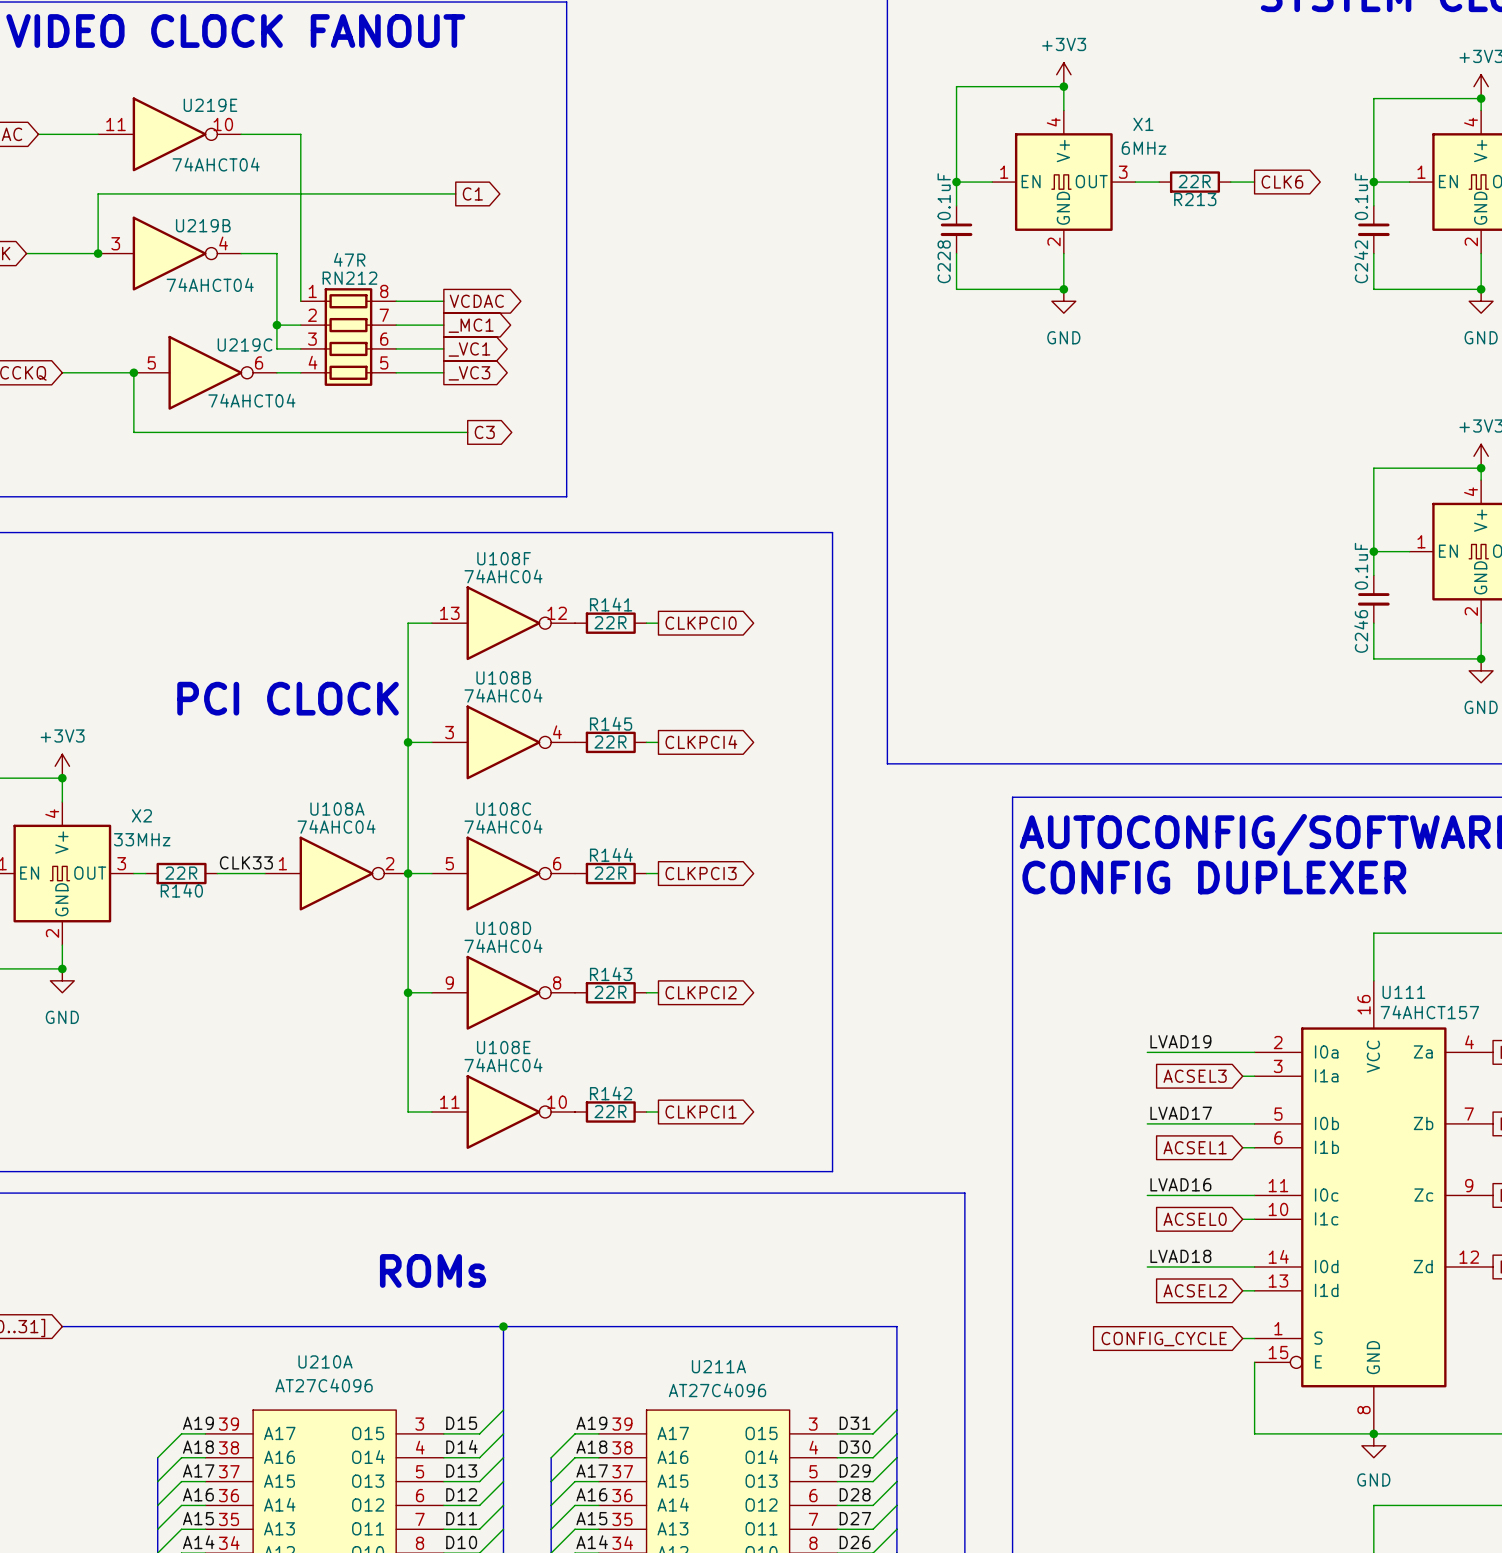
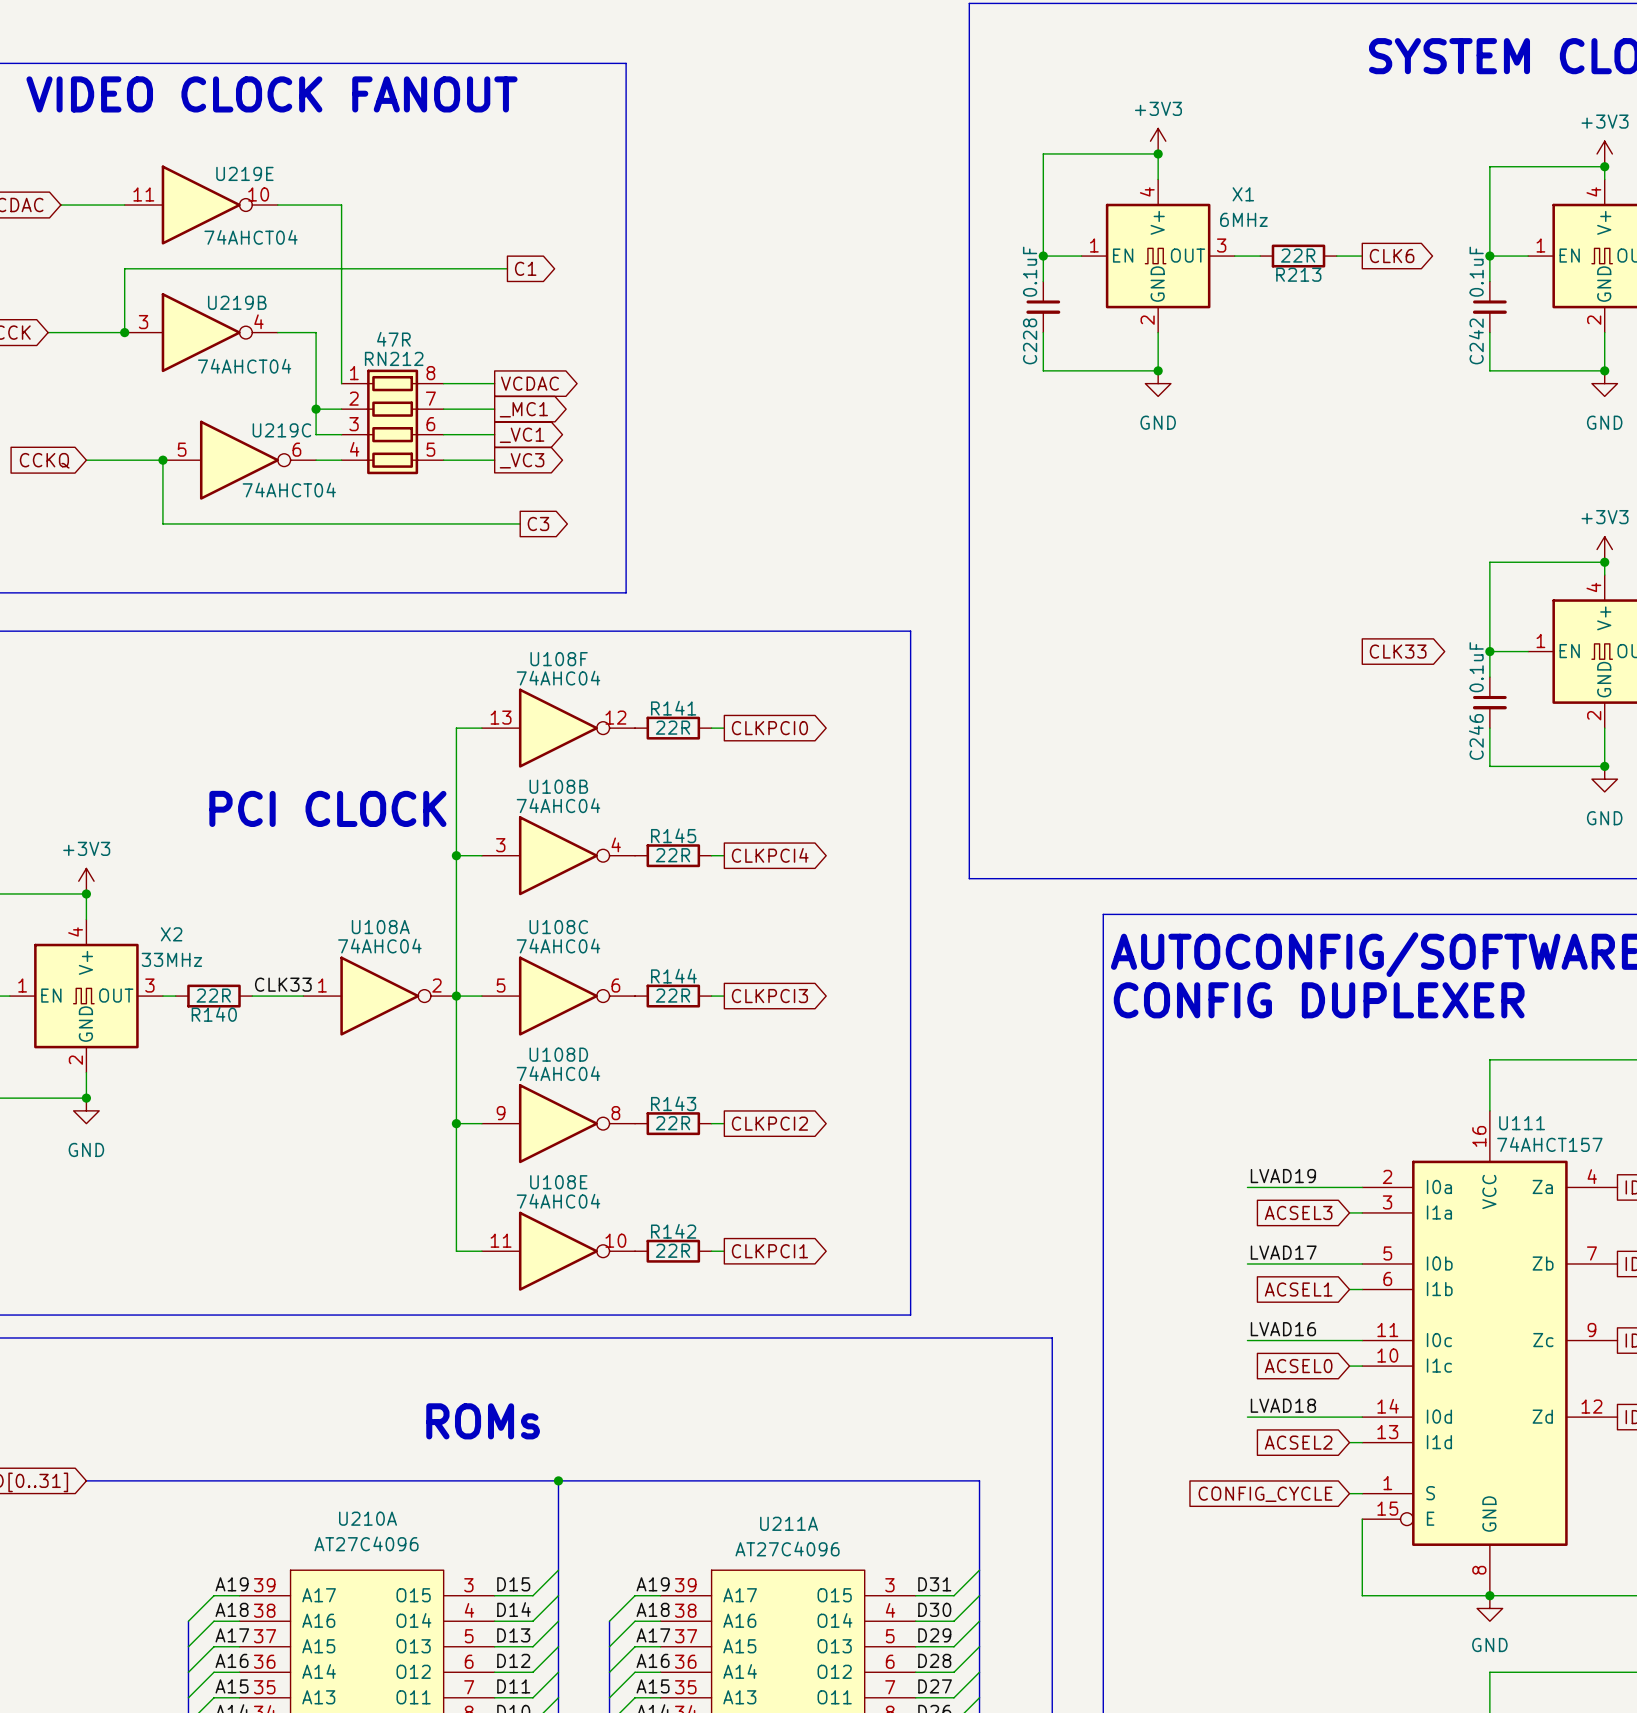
global label: none -> CLK33 (1398, 651)

